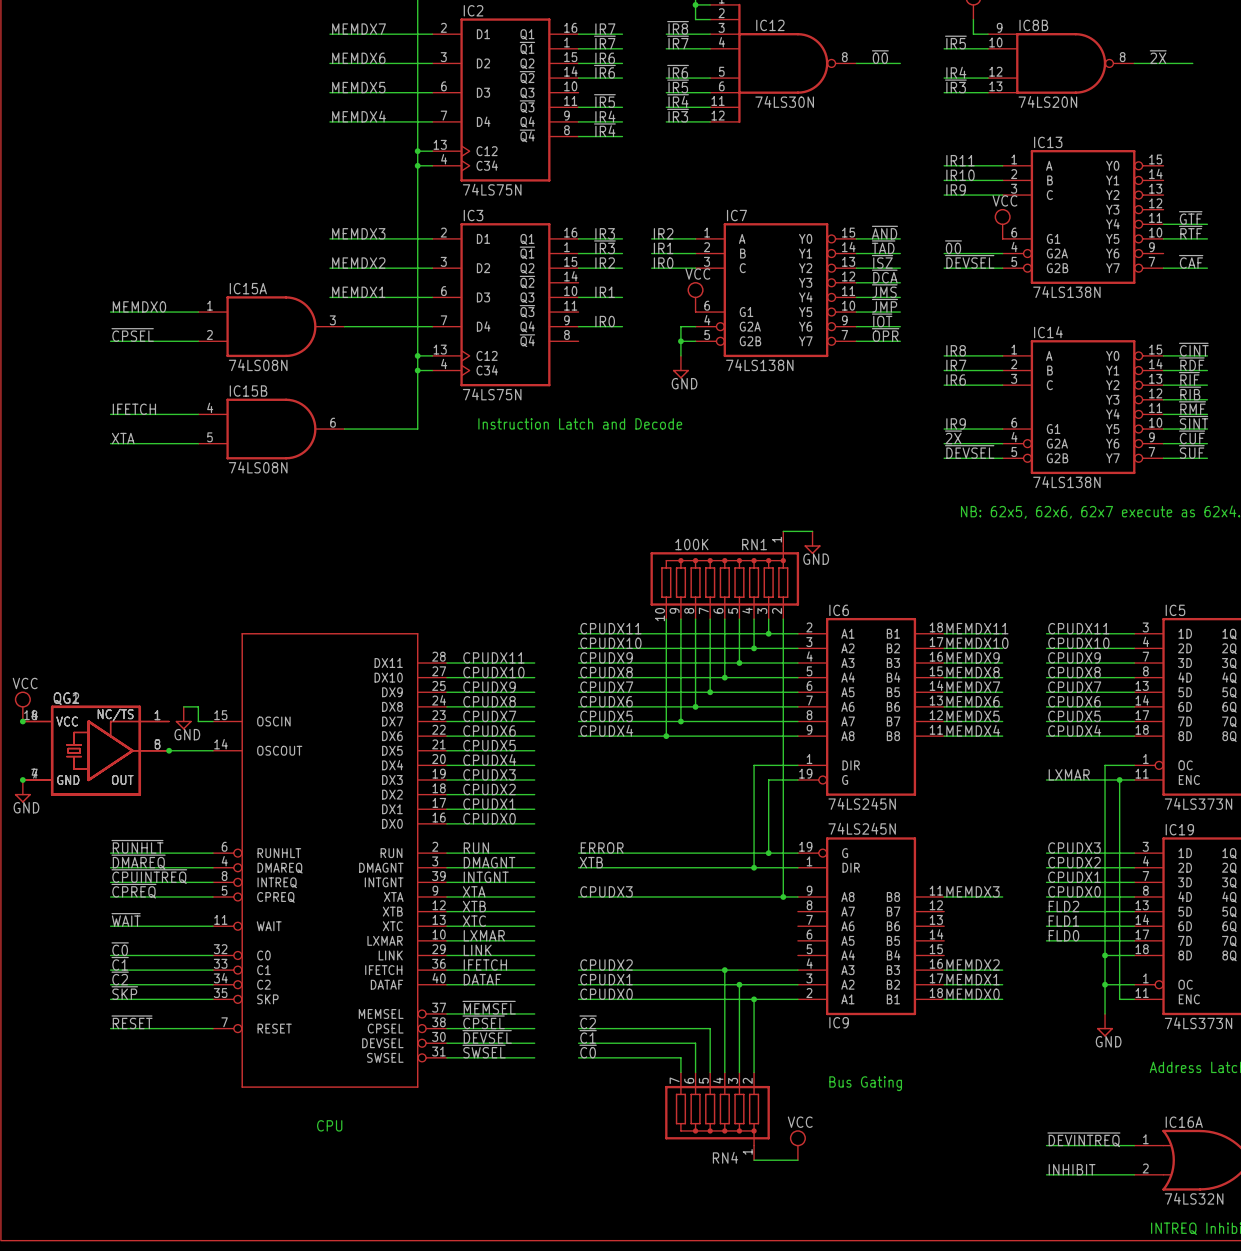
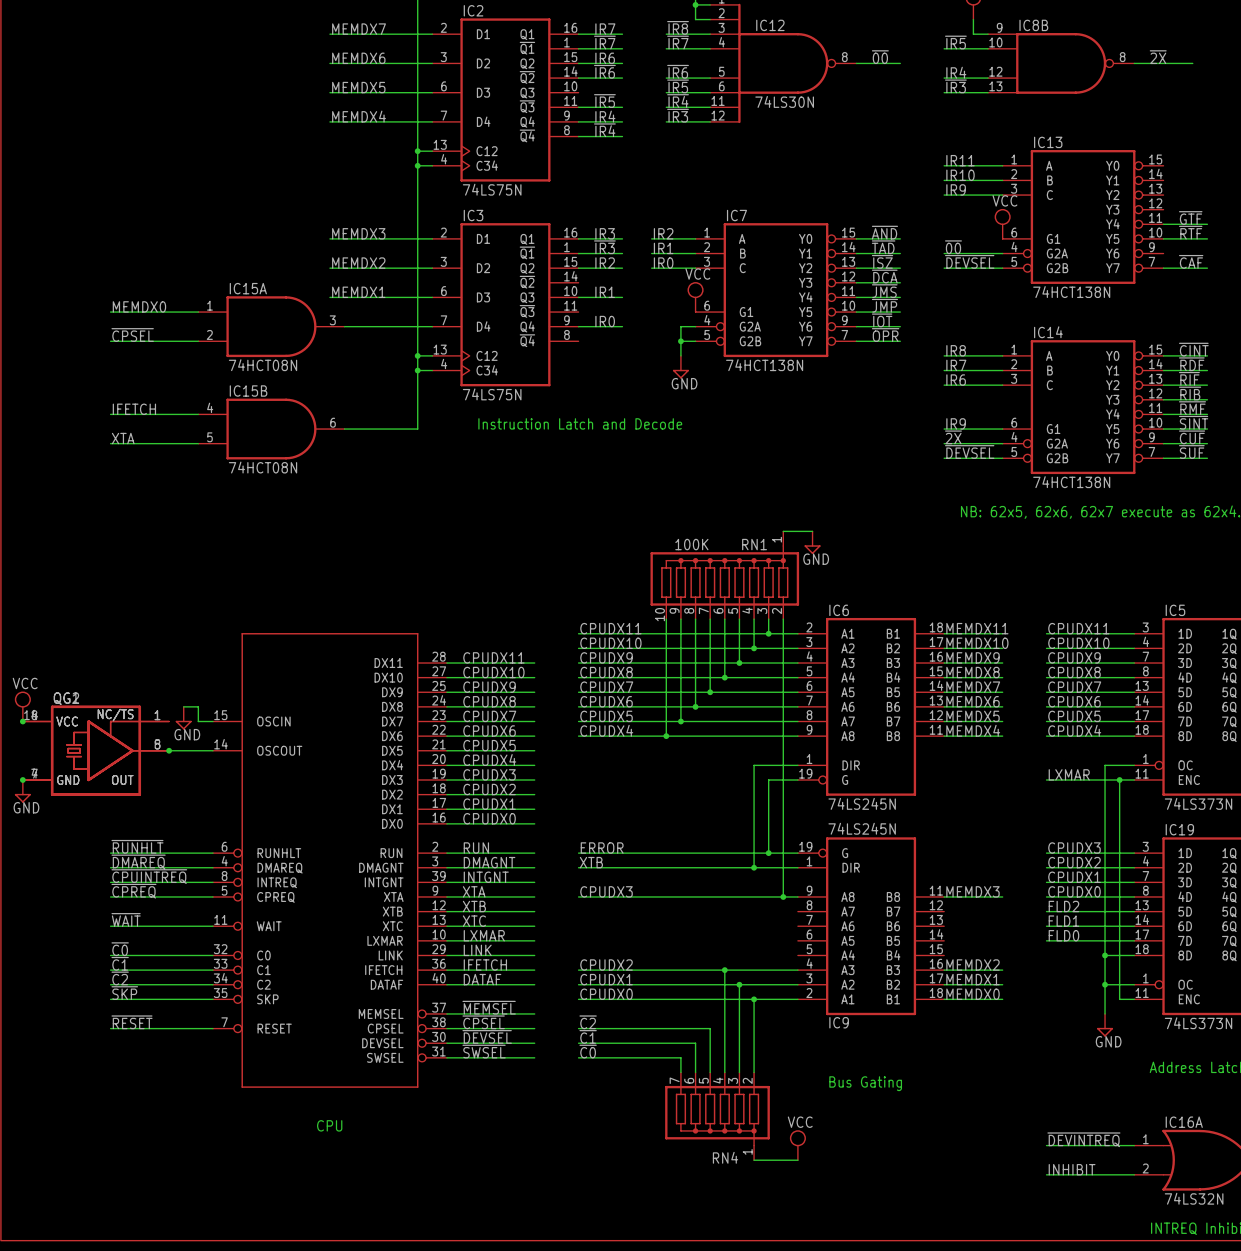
IC8B value: 74LS20N (1047, 101) -> none
IC13 value: 74LS138N (1066, 292) -> 74HCT138N (1071, 292)
IC15A value: 74LS08N (258, 365) -> 74HCT08N (263, 365)
IC7 value: 74LS138N (759, 365) -> 74HCT138N (764, 365)
IC15B value: 74LS08N (258, 467) -> 74HCT08N (263, 467)
IC14 value: 74LS138N (1066, 482) -> 74HCT138N (1071, 482)

